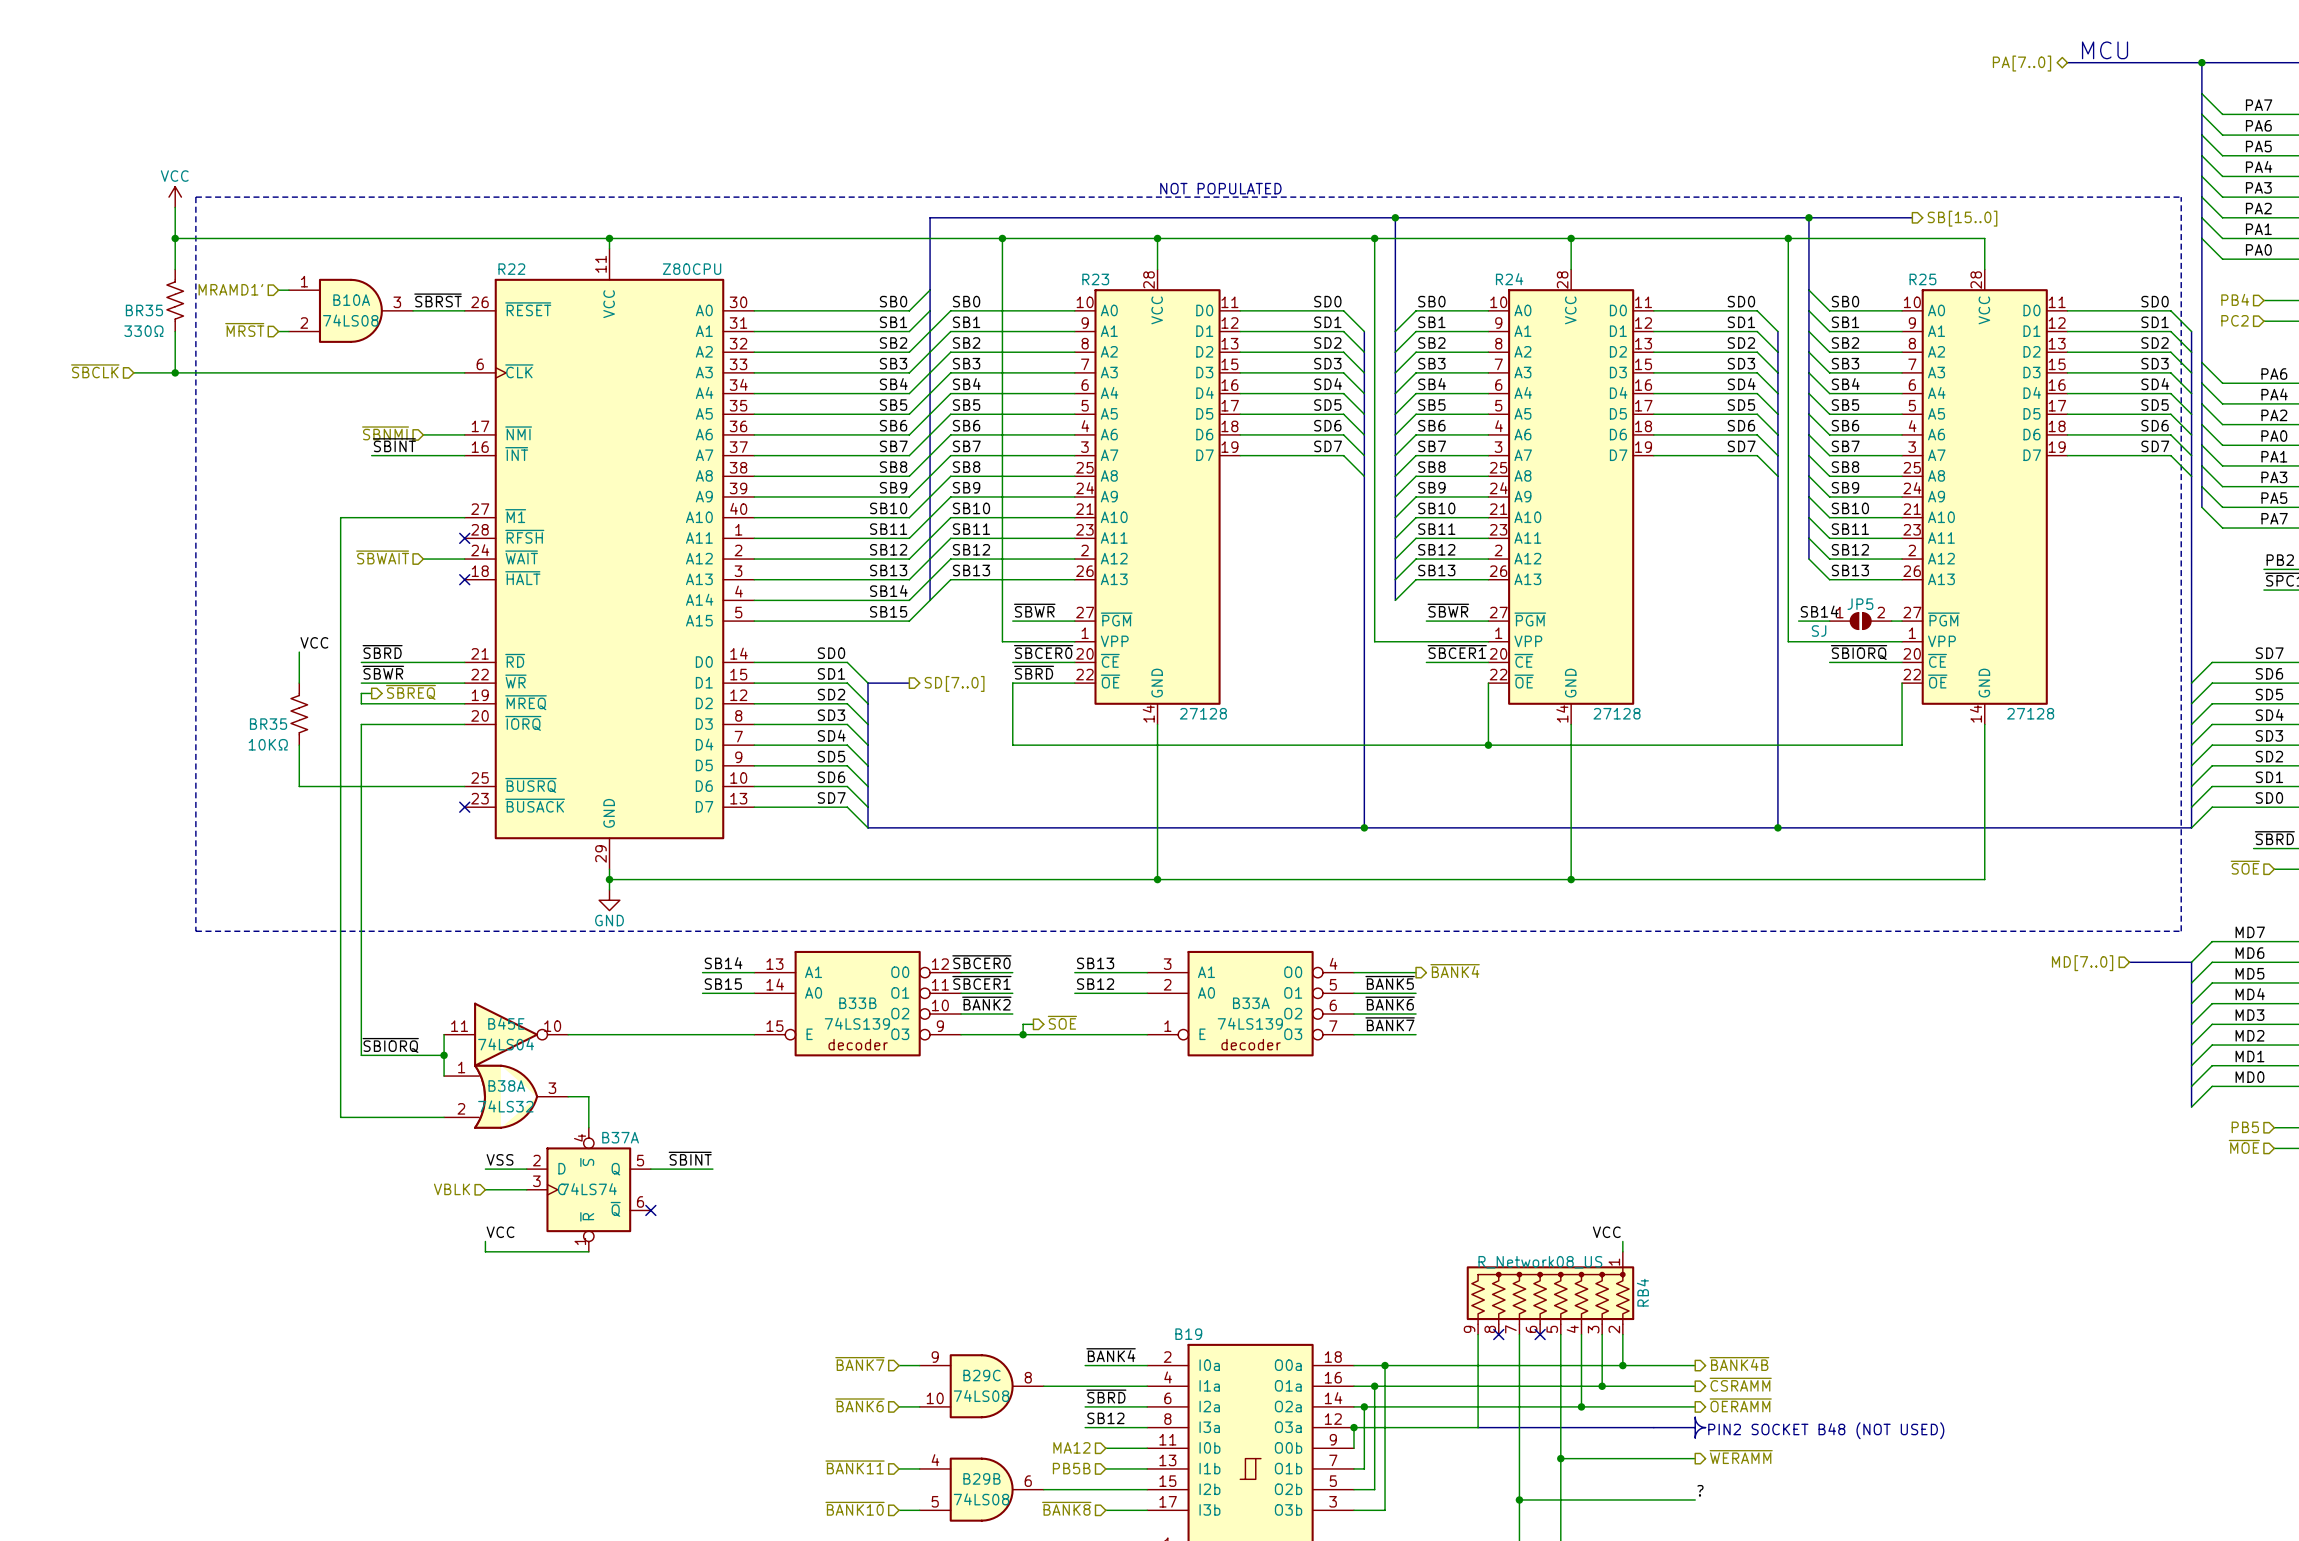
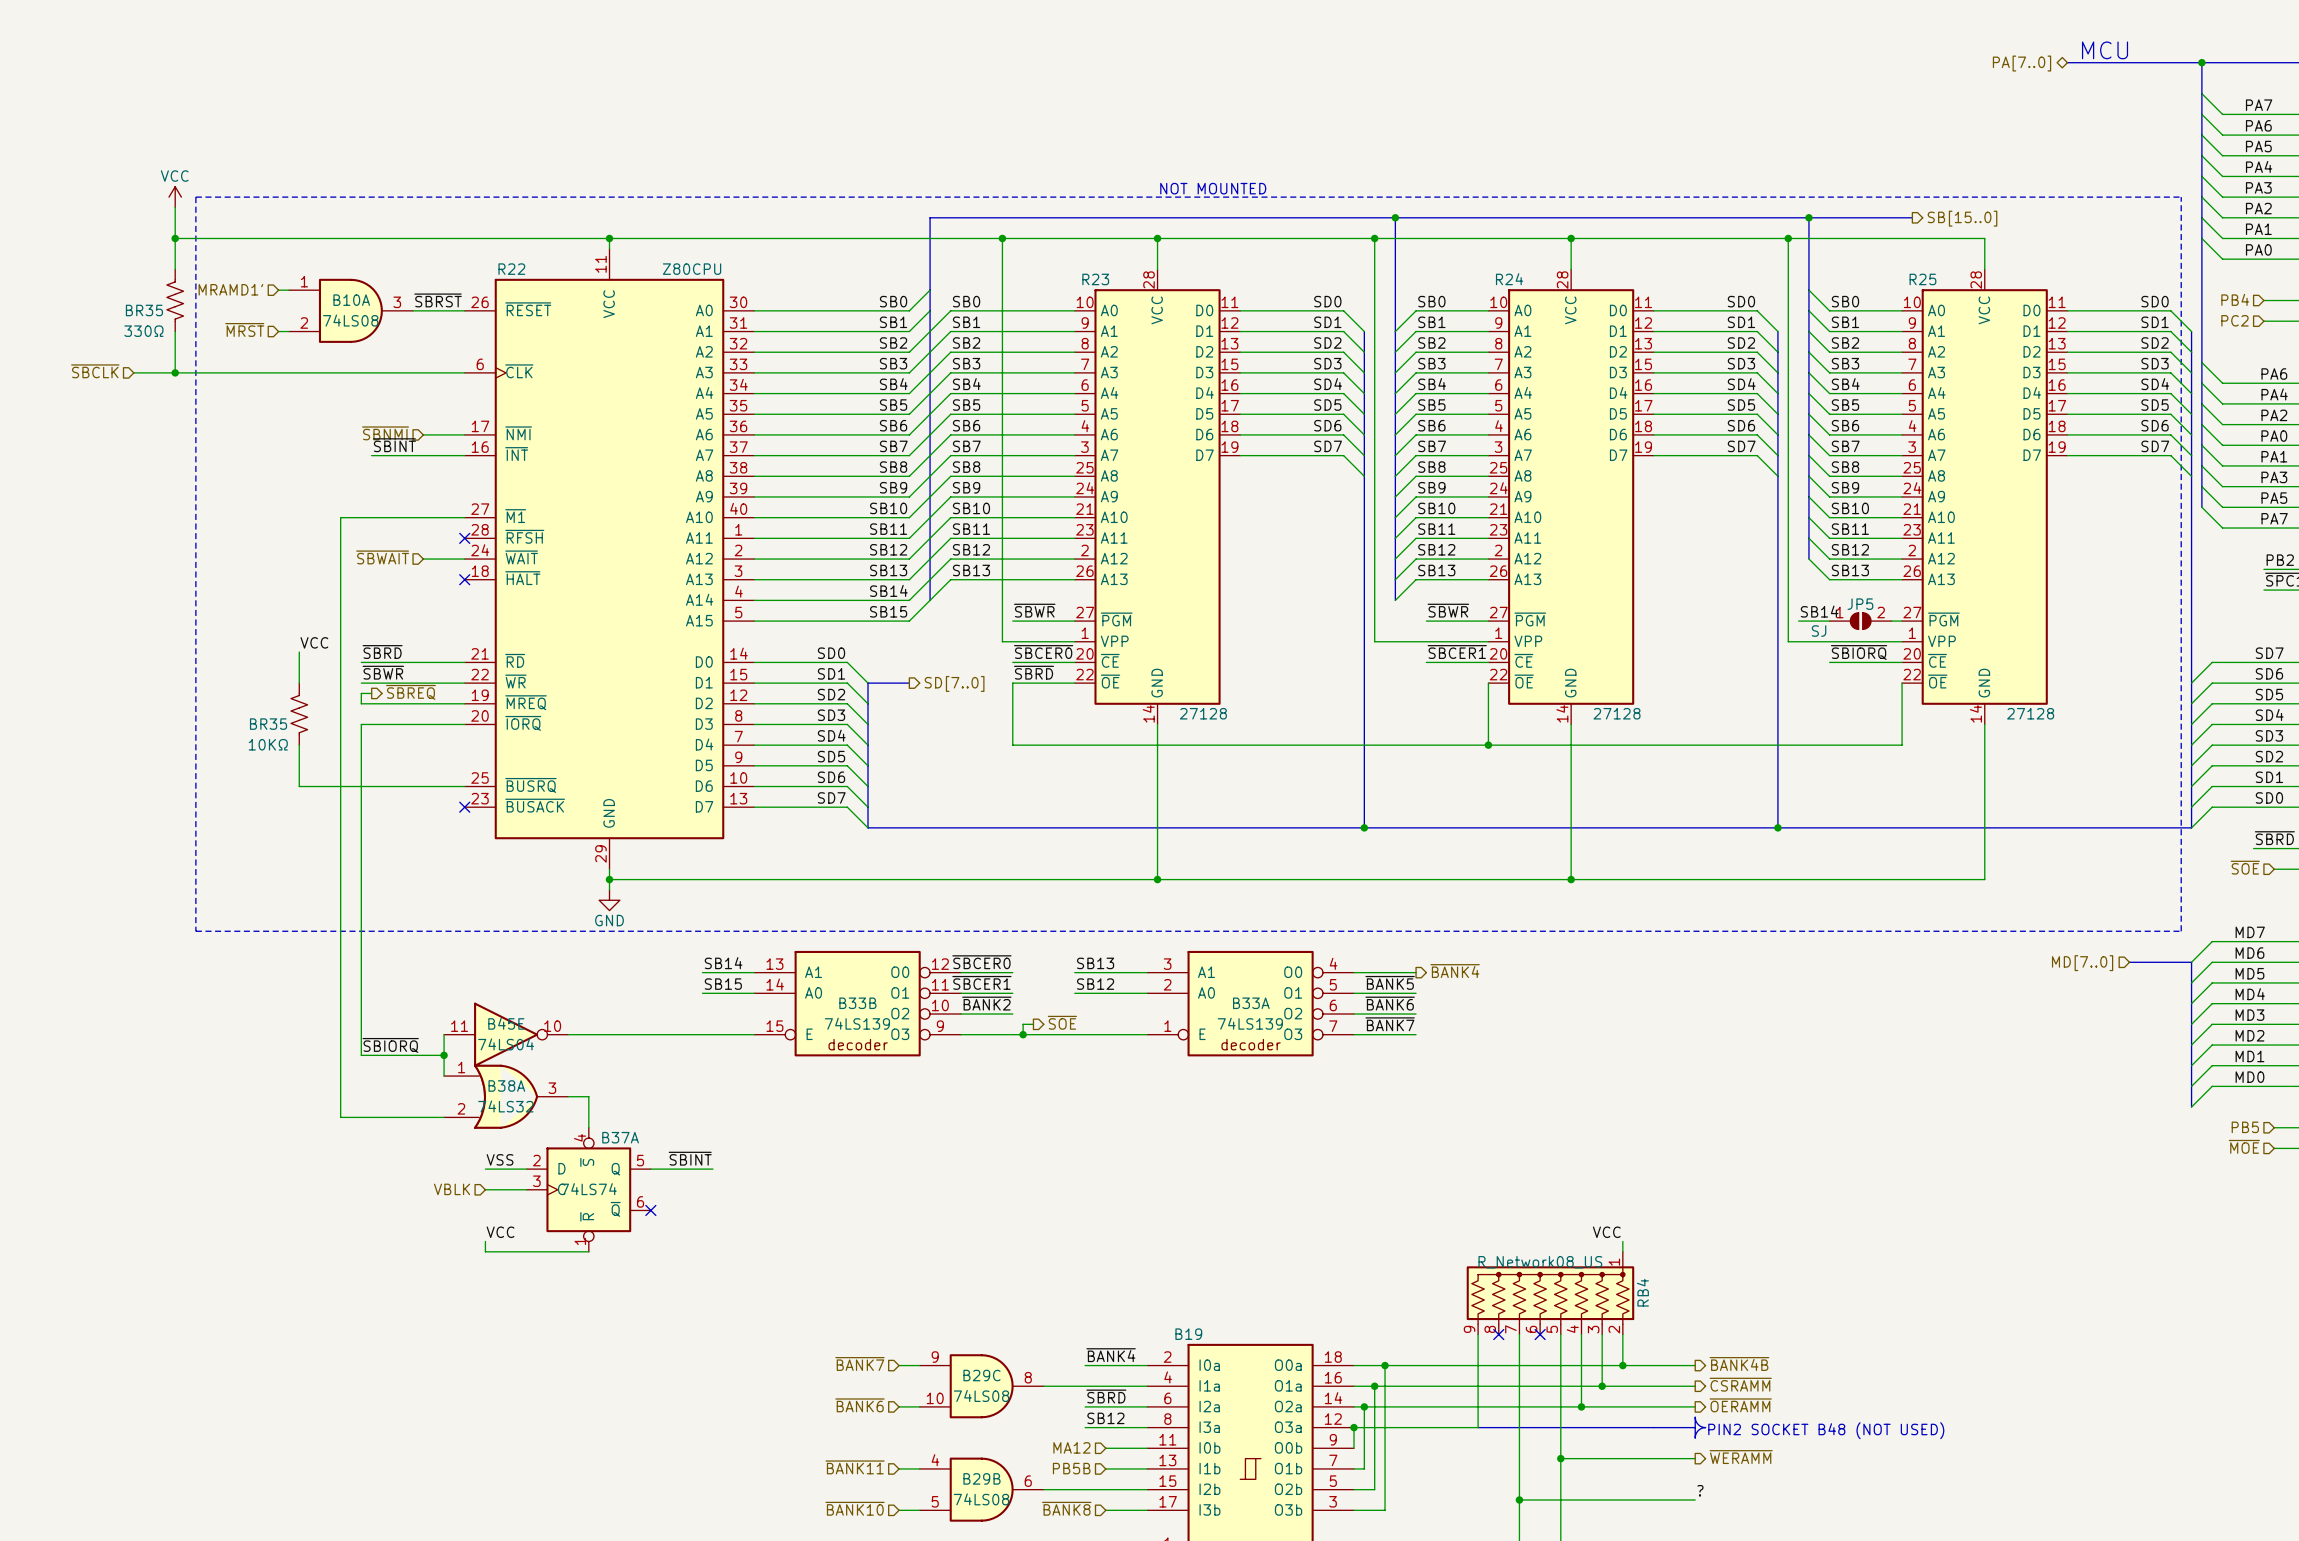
text: NOT POPULATED (1220, 188) -> NOT MOUNTED (1213, 188)

